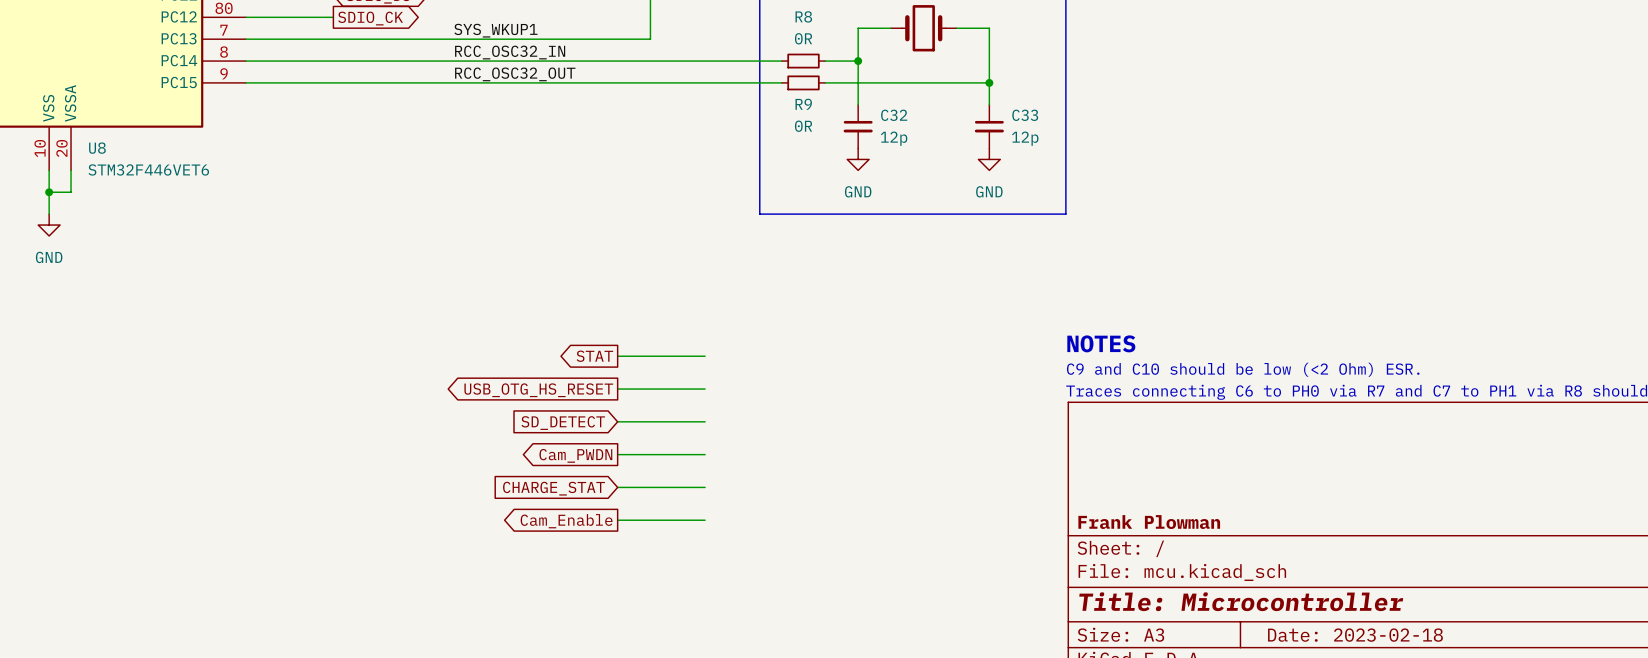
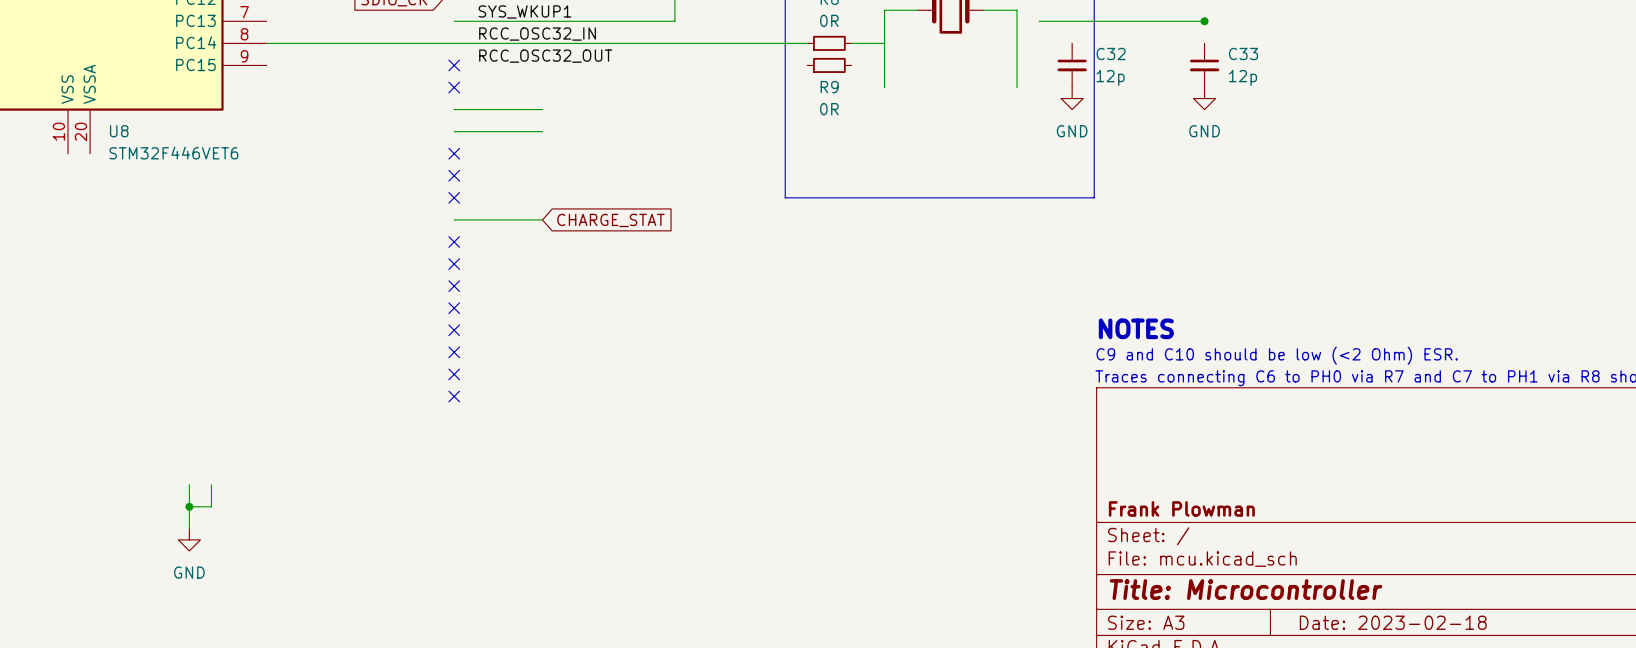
wire: (245, 39) (431, 39) -> none
junction: none -> (1204, 21)
junction: (858, 61) -> none
wire: (245, 82) (781, 82) -> none
no-connect mark: none -> (454, 65)
wire: (825, 82) (989, 82) -> (1039, 21) (1204, 21)
junction: (989, 82) -> none
no-connect mark: none -> (454, 87)
power symbol: none -> GND (1204, 98)
wire: none -> (454, 109) (542, 109)
C32 position: (858, 126) -> (1072, 65)
C33 position: (989, 126) -> (1204, 65)
wire: none -> (454, 131) (542, 131)
power symbol: GND (858, 159) -> none
power symbol position: GND (989, 159) -> GND (1072, 98)
wire: (49, 170) (49, 214) -> none
wire: (71, 170) (71, 192) (49, 192) -> none
no-connect mark: none -> (454, 153)
junction: (49, 192) -> none
no-connect mark: none -> (454, 175)
no-connect mark: none -> (454, 197)
power symbol: GND (49, 225) -> none
wire: none -> (454, 219) (542, 219)
global label: none -> CHARGE_STAT (610, 220)
no-connect mark: none -> (454, 241)
no-connect mark: none -> (454, 264)
no-connect mark: none -> (454, 286)
no-connect mark: none -> (454, 308)
no-connect mark: none -> (454, 330)
global label: STAT (594, 356) -> none
wire: (617, 356) (705, 356) -> none
no-connect mark: none -> (454, 352)
no-connect mark: none -> (454, 374)
wire: (617, 389) (705, 389) -> none
global label: USB_OTG_HS_RESET (538, 390) -> none
no-connect mark: none -> (454, 396)
wire: (617, 421) (705, 421) -> none
global label: SD_DETECT (563, 423) -> none
wire: (617, 454) (705, 454) -> none
global label: Cam_PWDN (575, 455) -> none
wire: (617, 487) (705, 487) -> none
global label: CHARGE_STAT (554, 488) -> none
wire: none -> (189, 484) (189, 528)
wire: none -> (211, 484) (211, 506) (189, 506)
junction: none -> (189, 506)
wire: (617, 520) (705, 520) -> none
global label: Cam_Enable (566, 521) -> none
power symbol: none -> GND (189, 539)

